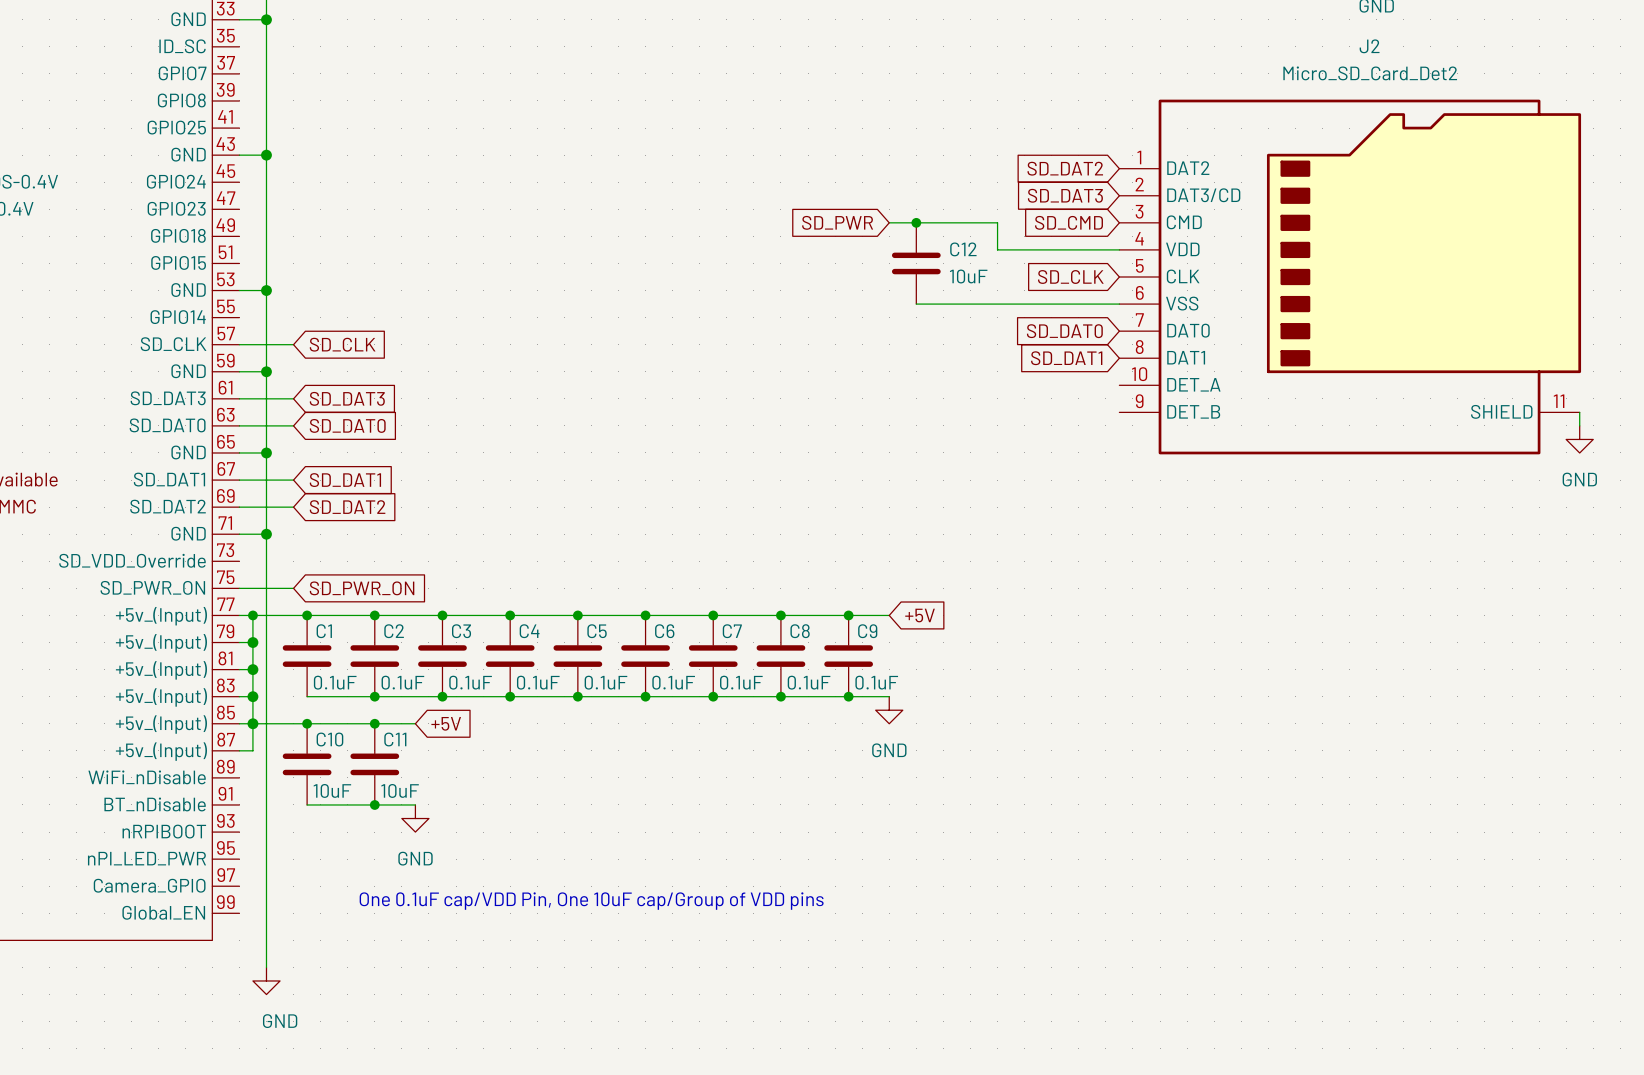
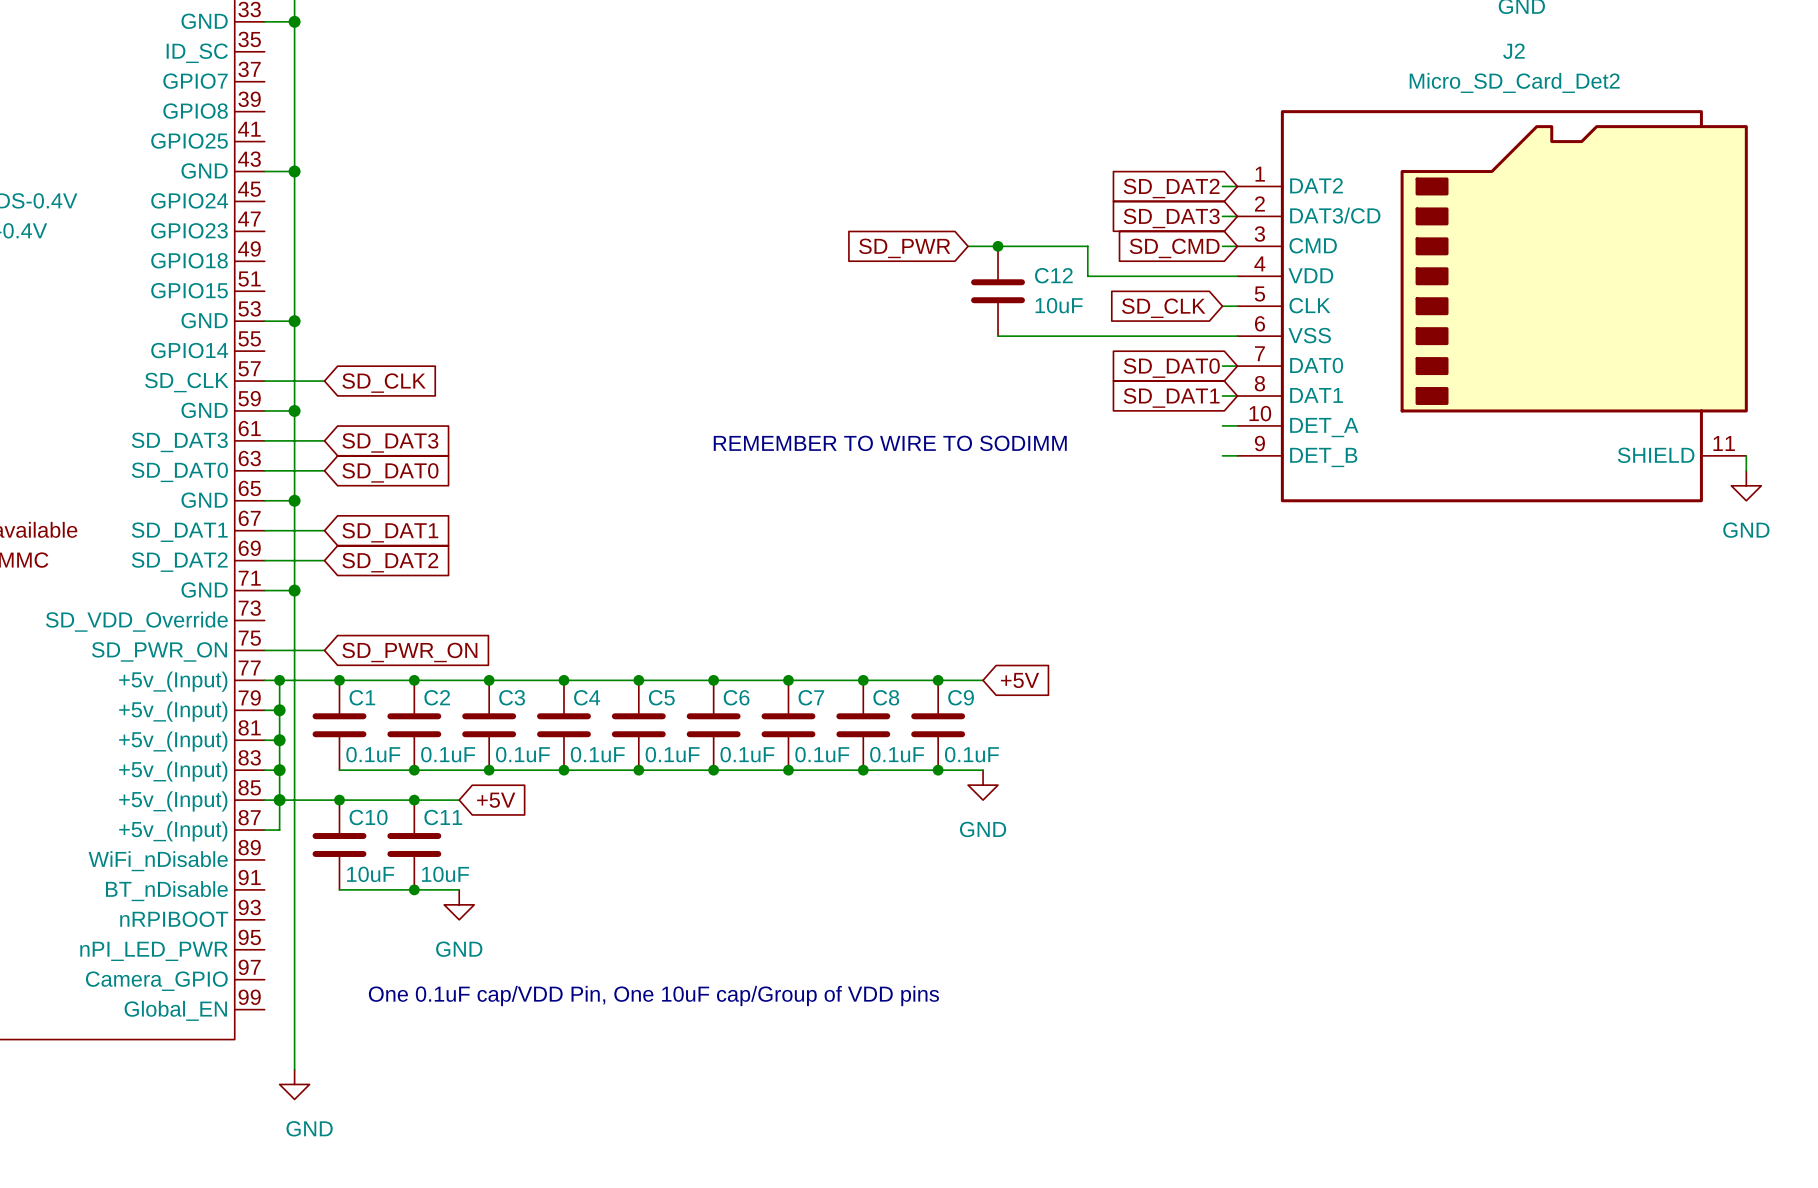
wire: none -> (1222, 186) (1237, 186)
wire: none -> (1222, 216) (1237, 216)
global label position: SD_PWR (837, 222) -> SD_PWR (904, 248)
wire: none -> (968, 246) (983, 246)
junction position: (916, 222) -> (998, 246)
wire: (984, 222) (997, 222) (997, 249) -> (1087, 246) (1087, 276) (1102, 276)
wire: none -> (1222, 246) (1237, 246)
C12 position: (916, 263) -> (998, 291)
wire: none -> (1222, 306) (1237, 306)
global label position: SD_CLK (1070, 277) -> SD_CLK (1163, 308)
wire: none -> (998, 336) (1012, 336)
wire: none -> (1222, 366) (1237, 366)
wire: none -> (1222, 396) (1237, 396)
wire: none -> (1222, 425) (1237, 425)
text: none -> REMEMBER TO WIRE TO SODIMM (890, 443)
wire: none -> (1222, 455) (1237, 455)

